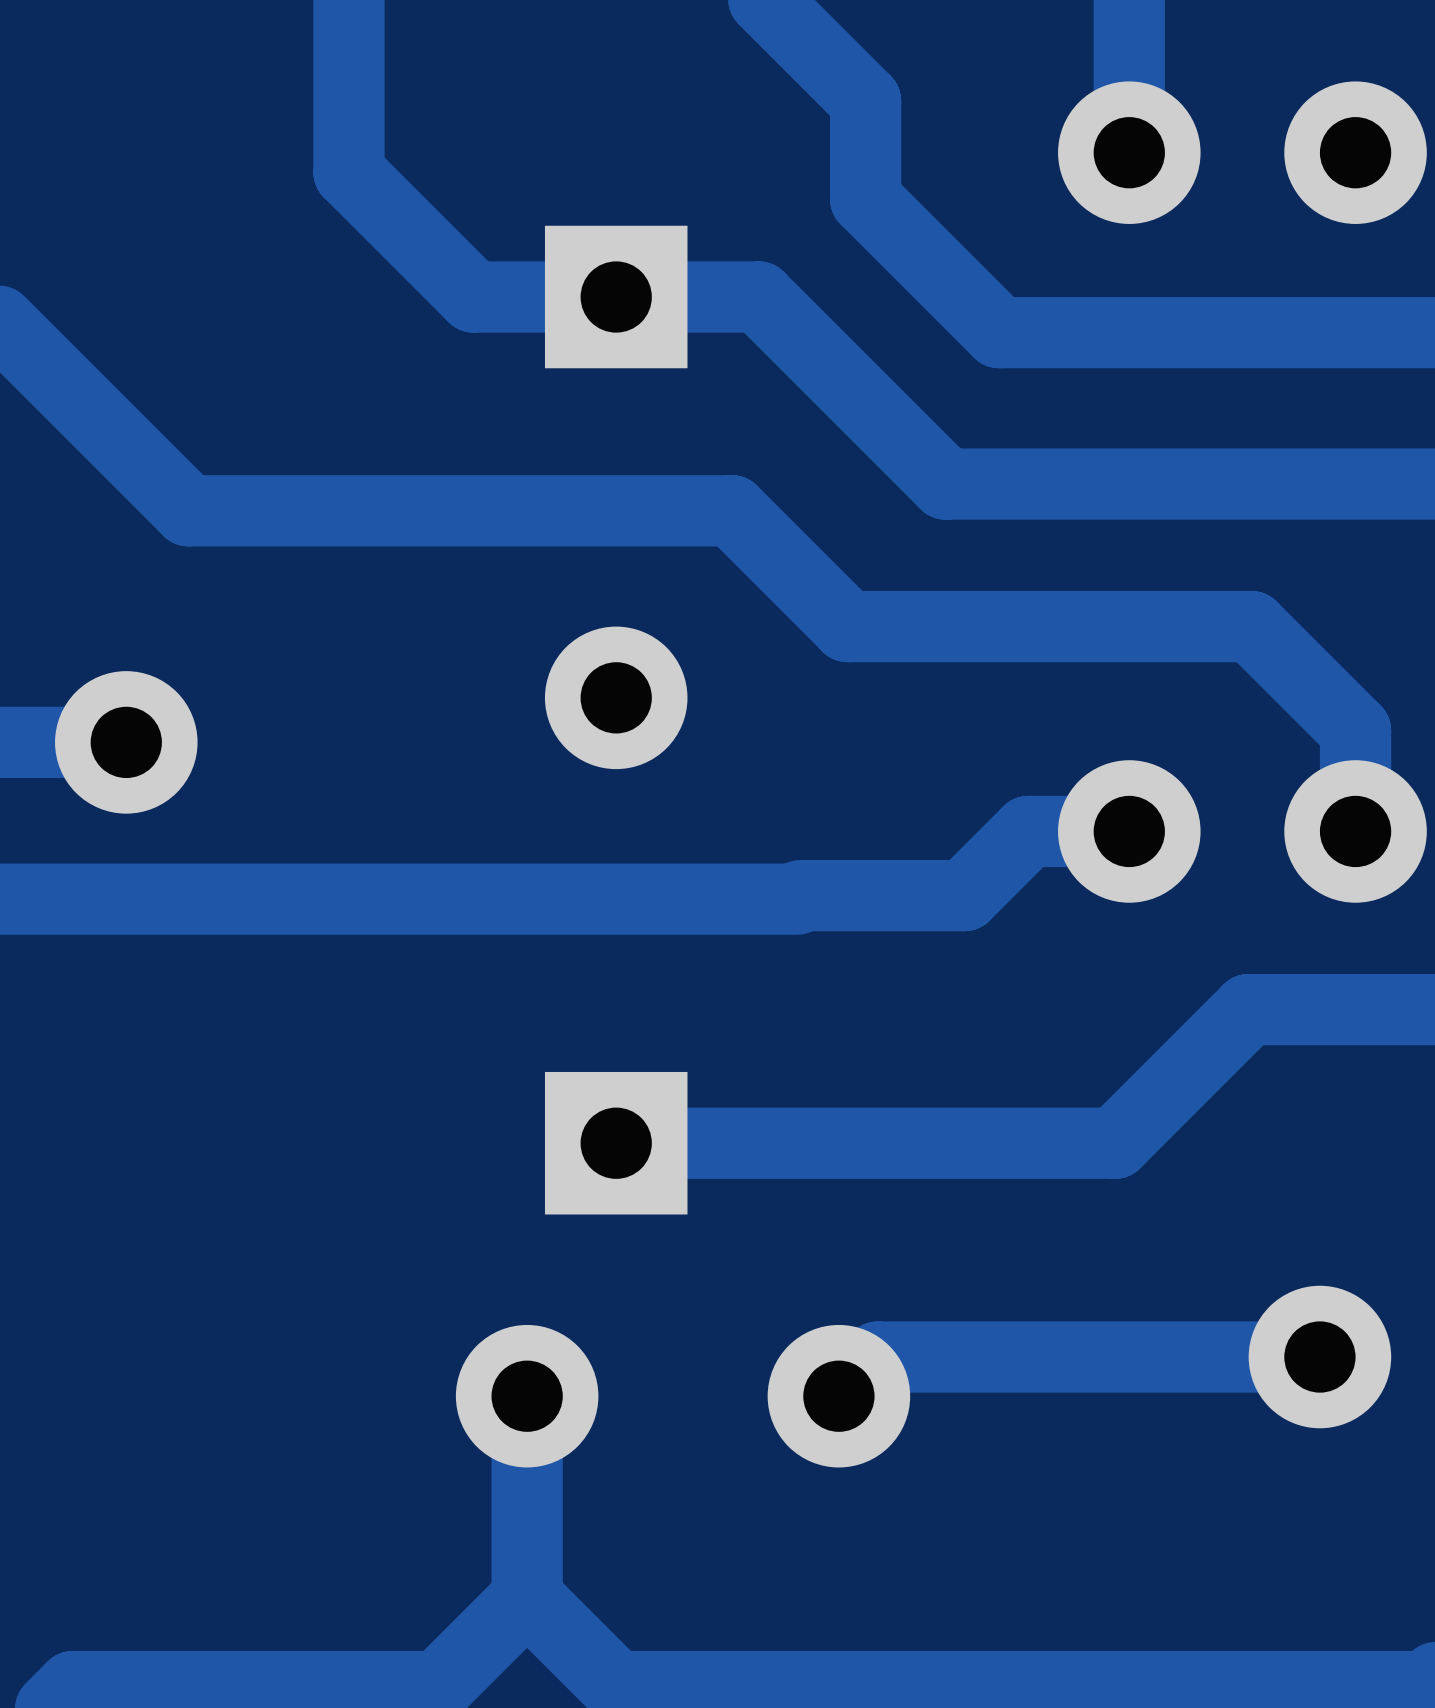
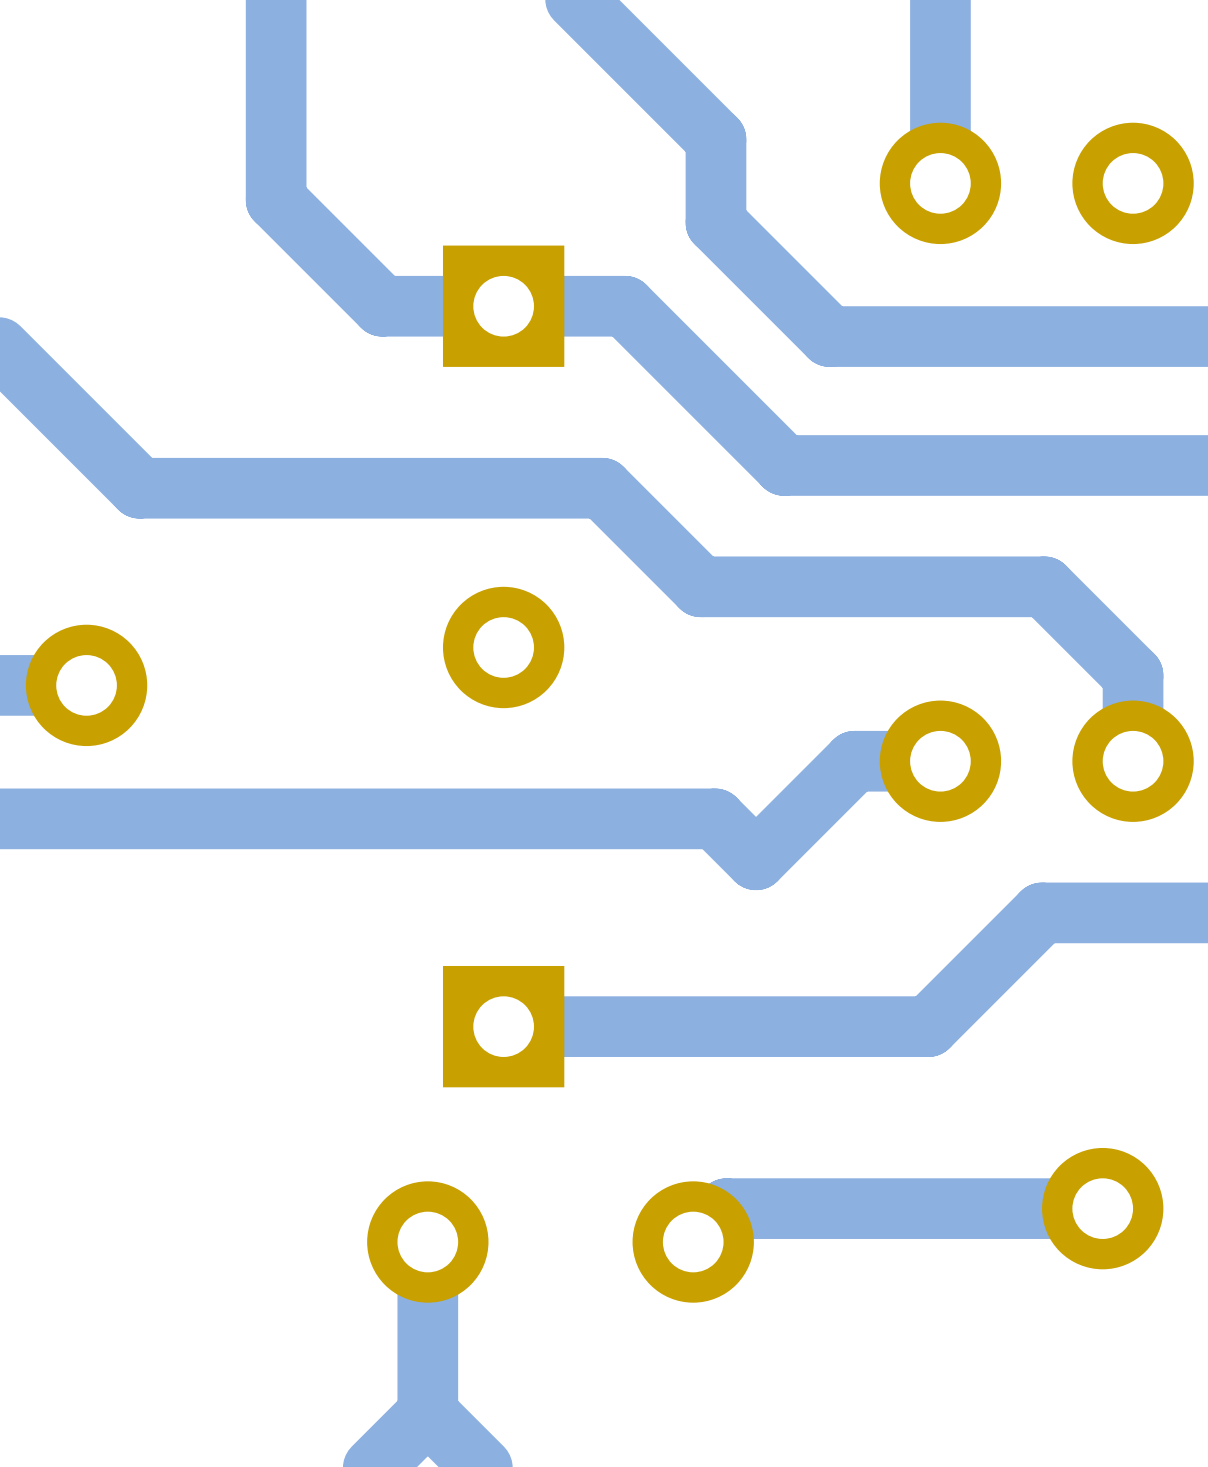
track: (964, 895) (800, 895) (797, 899) -> (800, 815) (756, 859) (715, 818) (657, 818)

